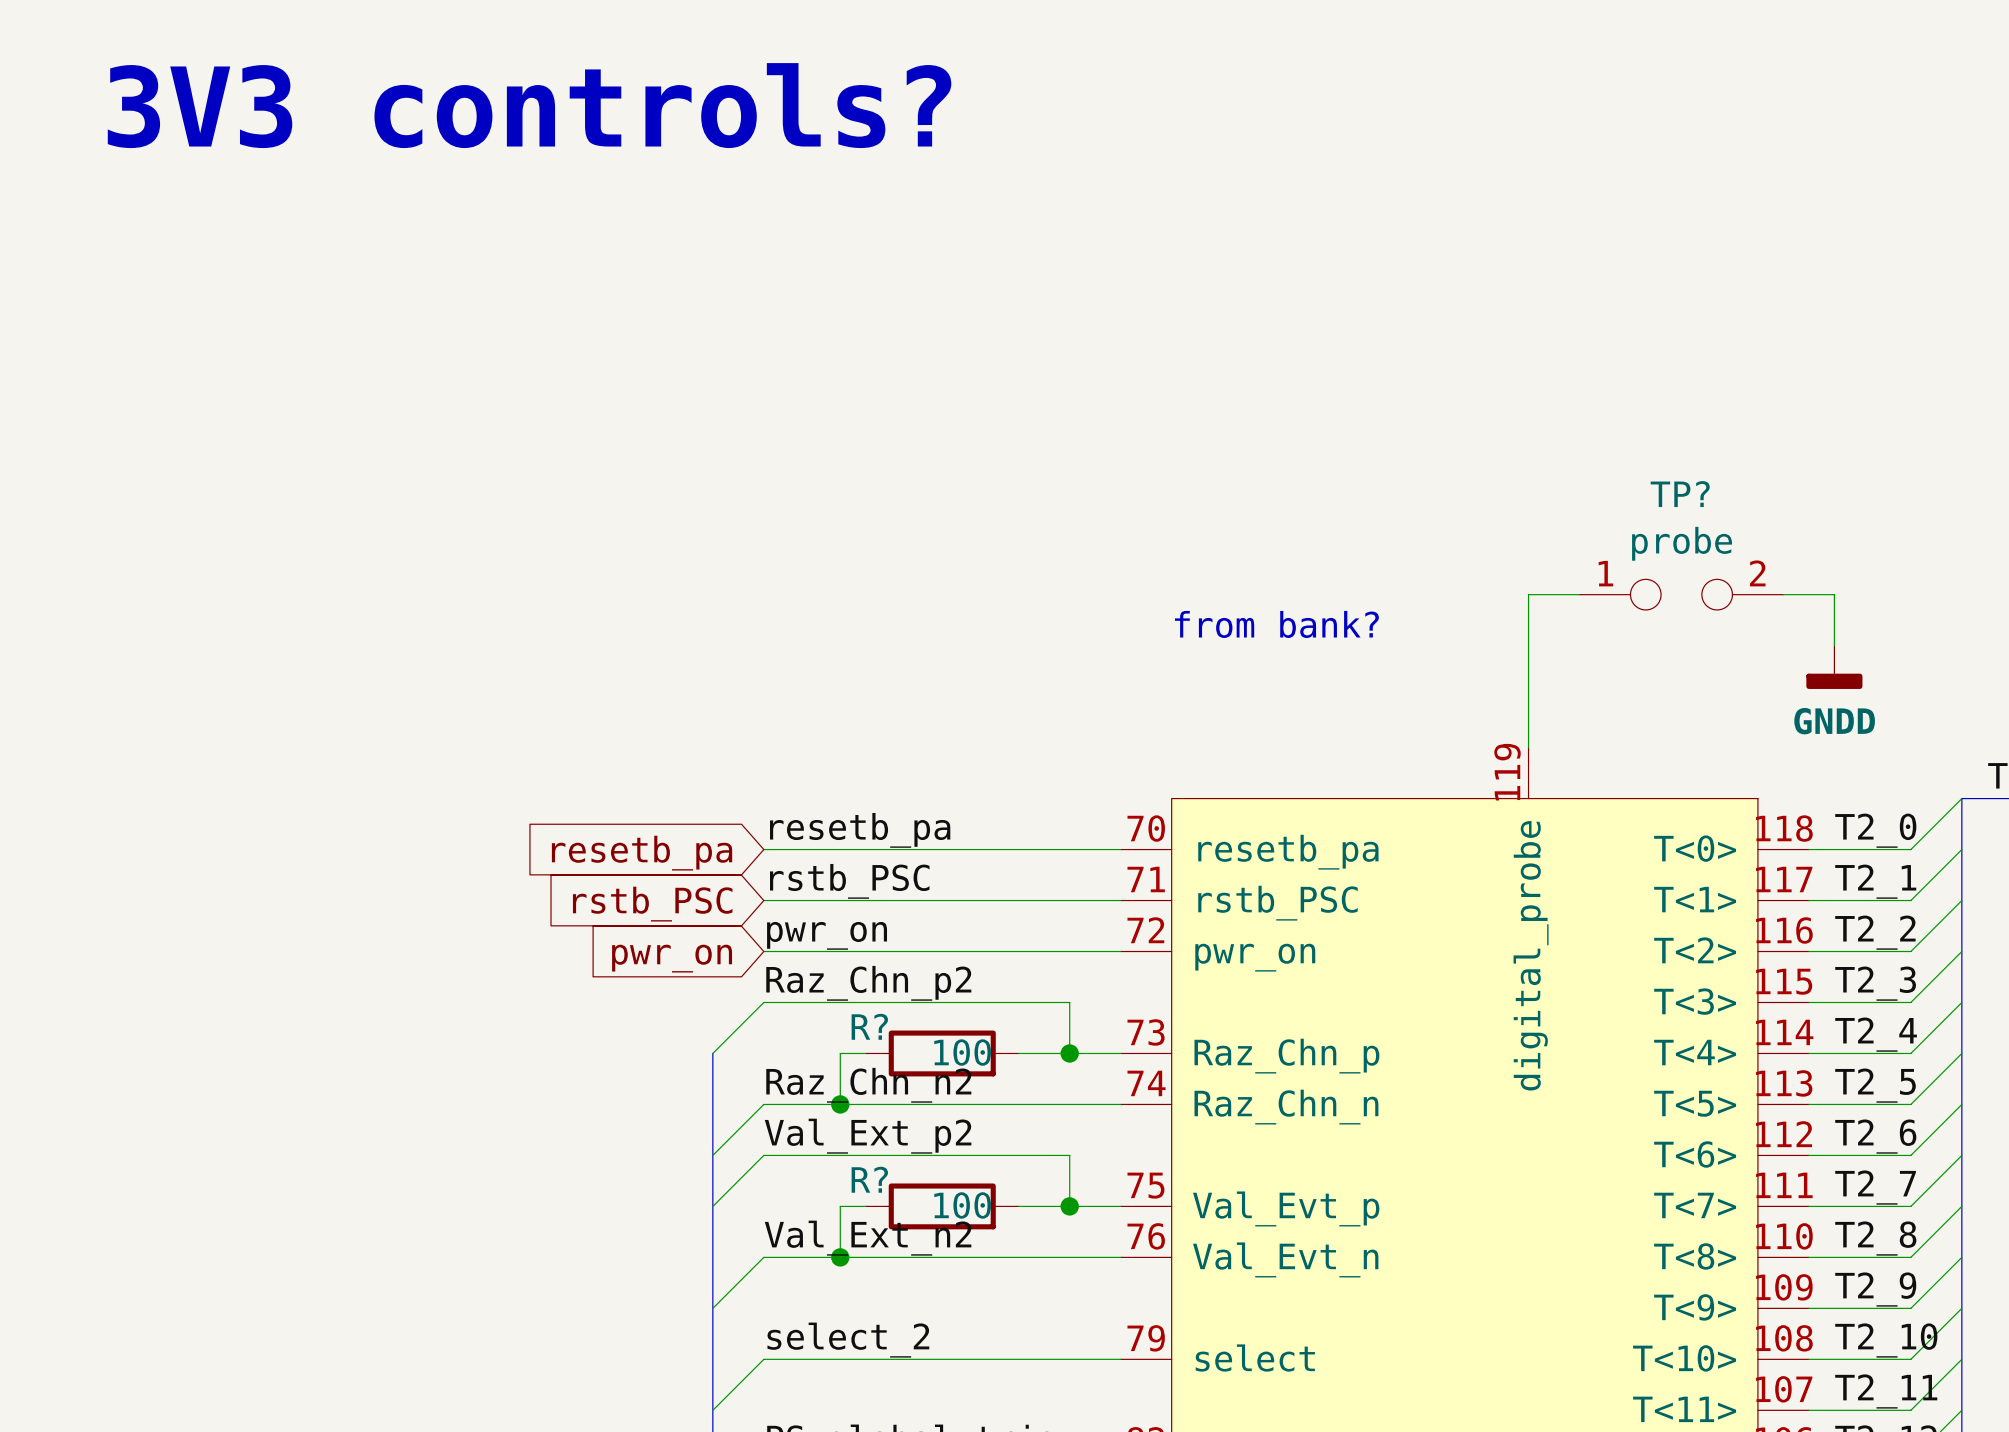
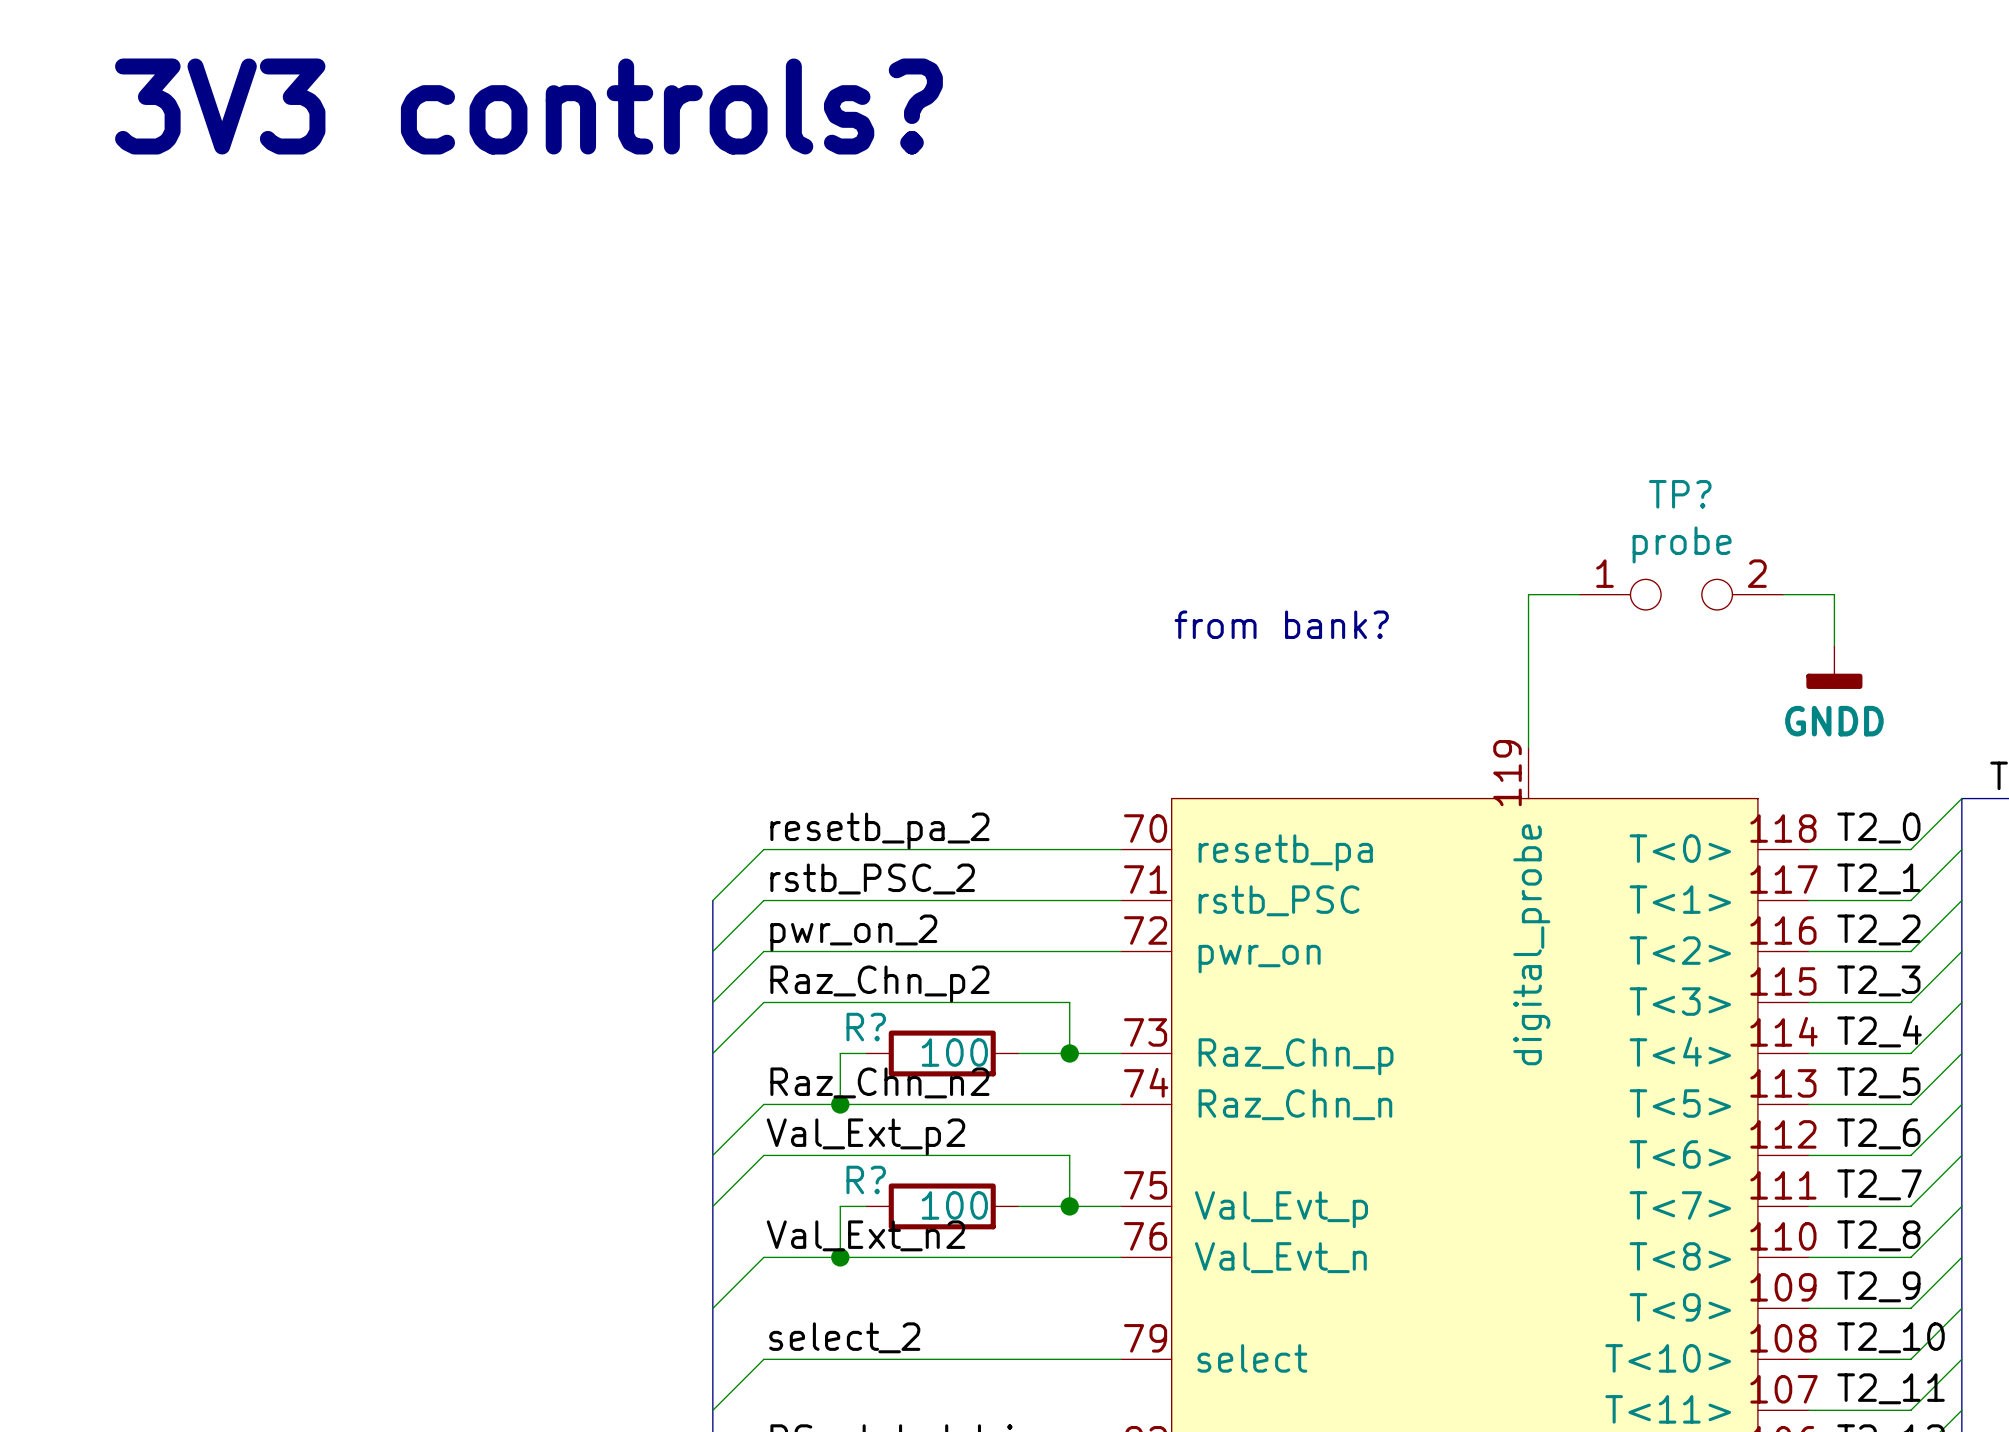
label: resetb_pa (860, 830) -> resetb_pa_2 (879, 831)
wire: none -> (763, 849) (712, 900)
global label: resetb_pa (642, 853) -> none
label: rstb_PSC (849, 881) -> rstb_PSC_2 (872, 879)
bus: none -> (712, 900) (712, 1053)
wire: none -> (763, 900) (712, 951)
global label: rstb_PSC (652, 904) -> none
label: pwr_on (827, 935) -> pwr_on_2 (853, 933)
wire: none -> (763, 951) (712, 1002)
global label: pwr_on (672, 958) -> none

